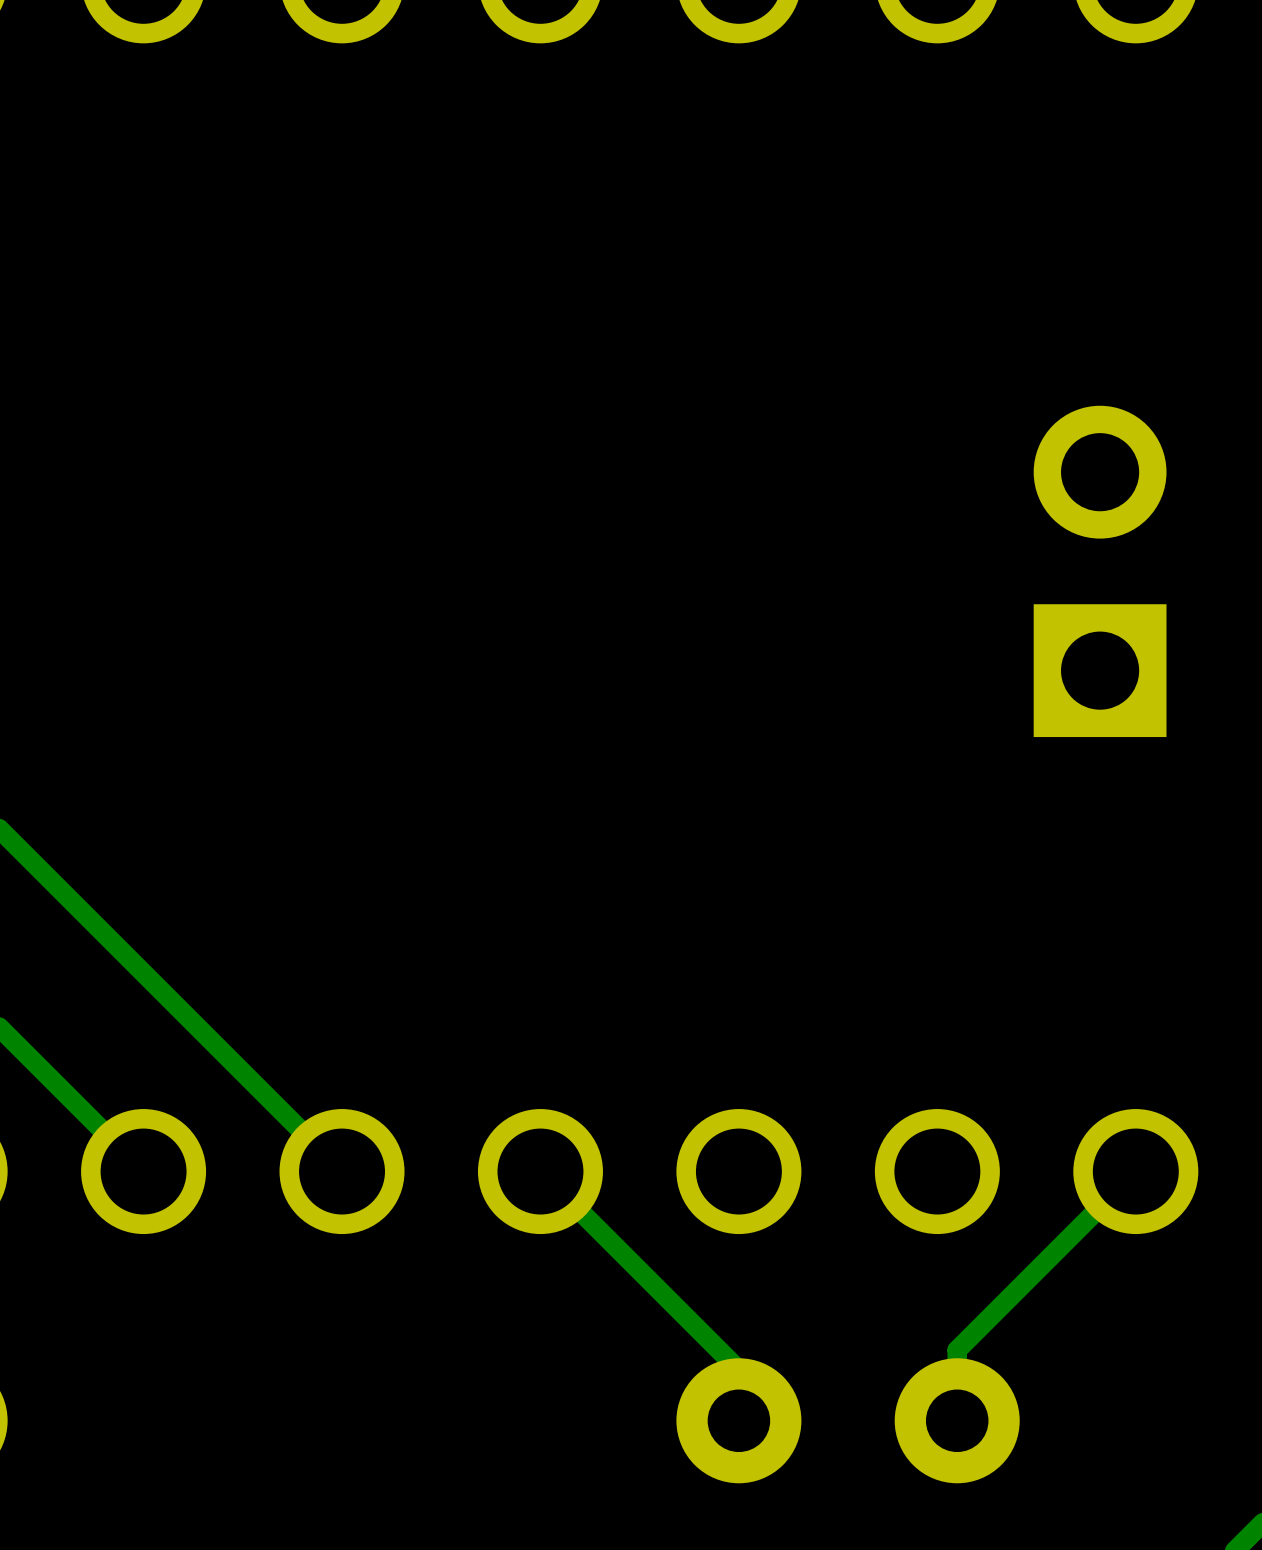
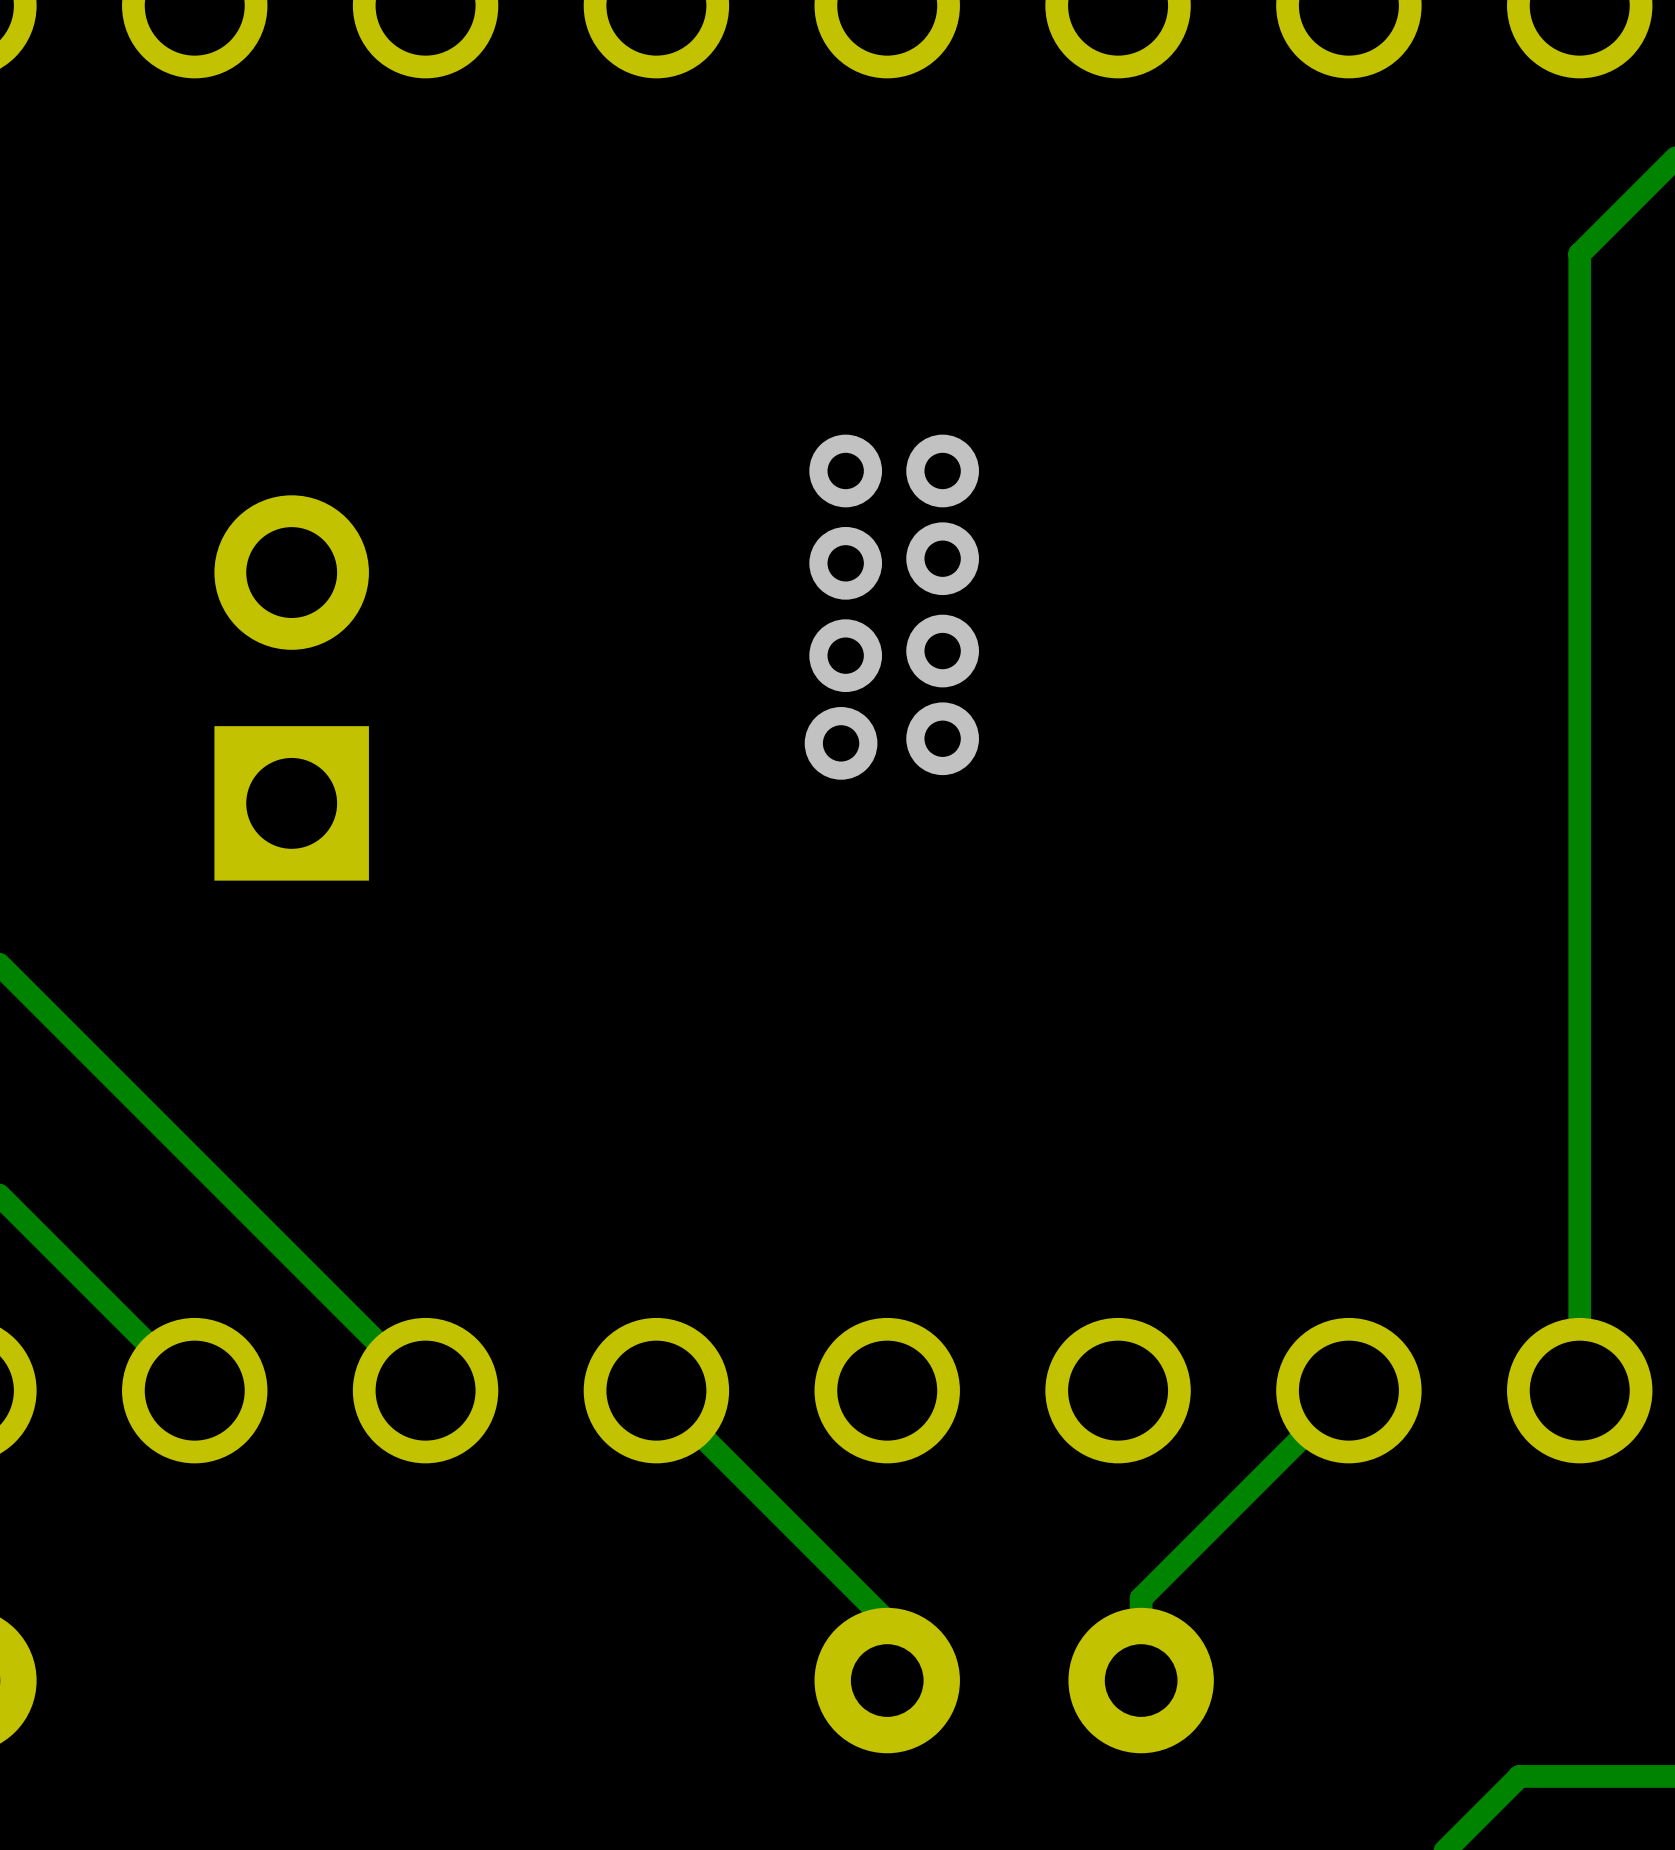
via: none -> (845, 470)
via: none -> (942, 470)
via: none -> (942, 558)
via: none -> (845, 563)
via: none -> (942, 651)
via: none -> (845, 655)
part position: (1100, 571) -> (291, 687)
via: none -> (942, 738)
via: none -> (841, 743)

